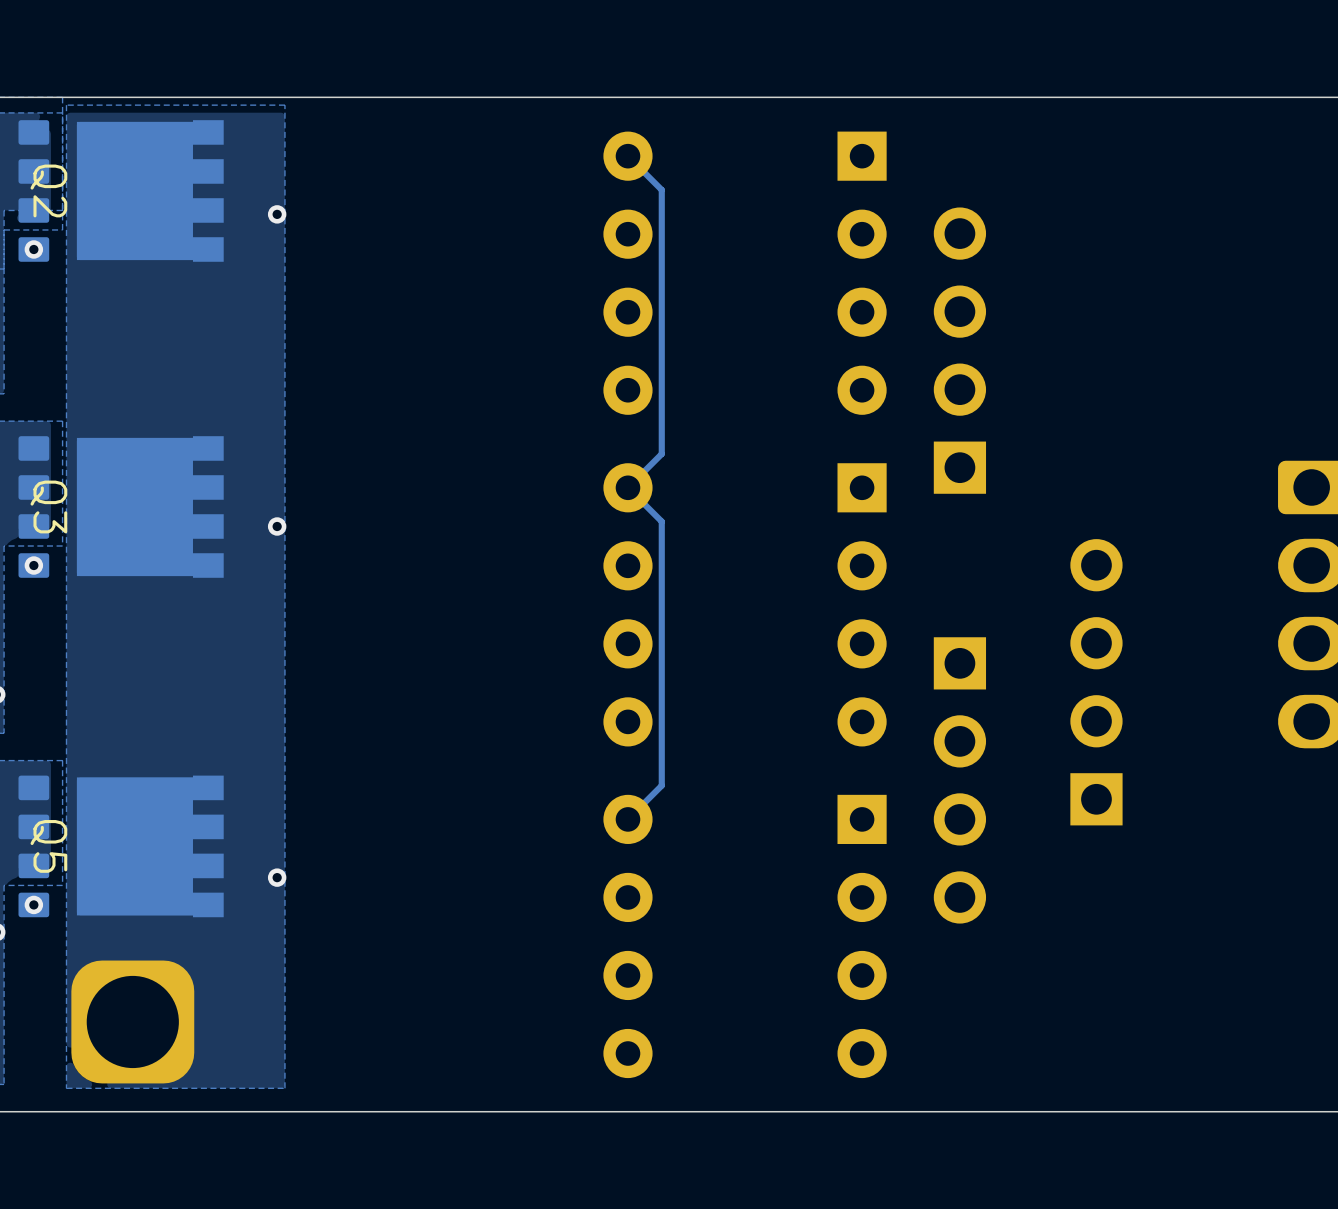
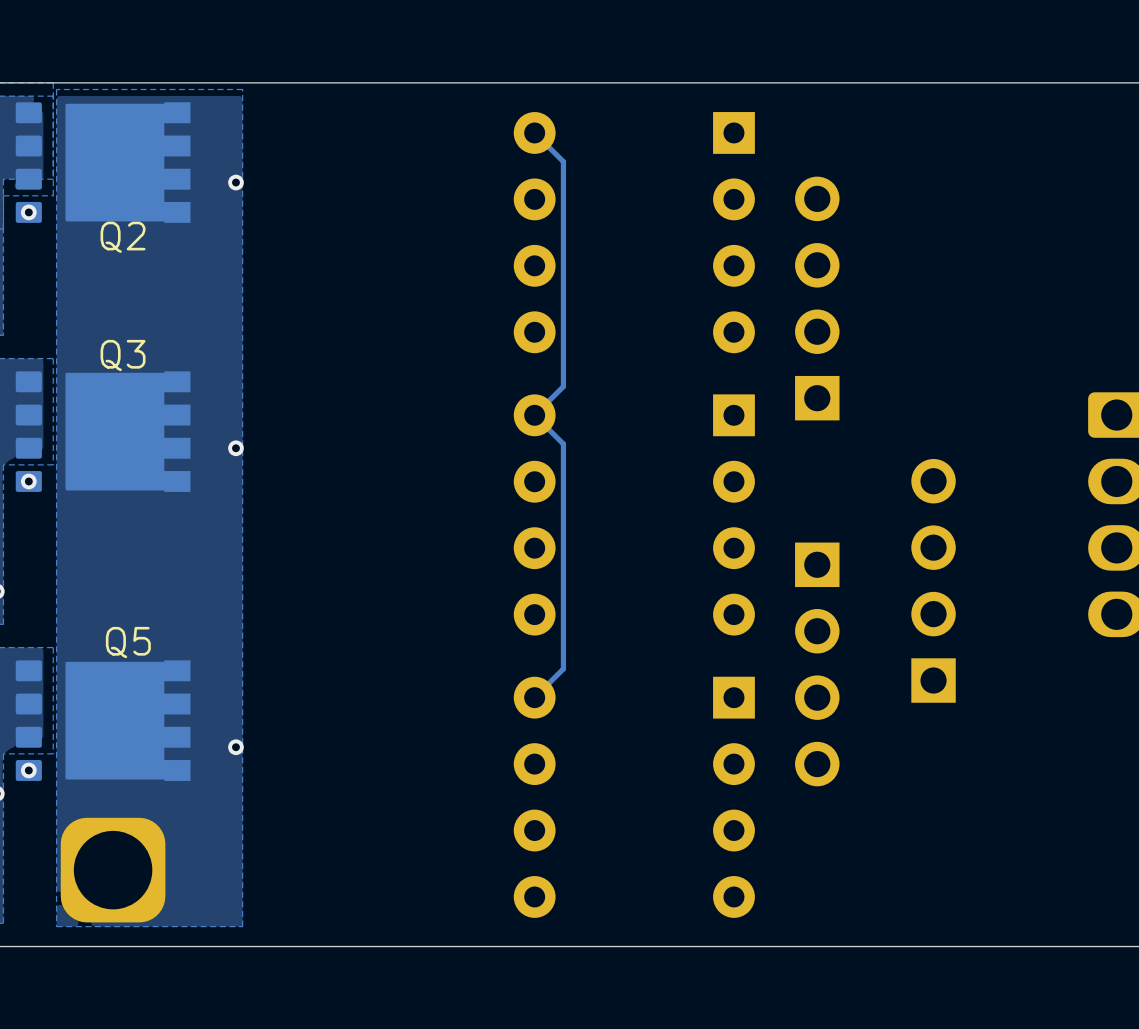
Q2 name rotation: 0° (48, 190) -> 90° counterclockwise (123, 237)
Q2 name position: Q2 (48, 190) -> Q2 (123, 237)
Q3 name rotation: 0° (48, 506) -> 90° counterclockwise (123, 355)
Q3 name position: Q3 (48, 506) -> Q3 (123, 355)
Q5 name rotation: 0° (48, 846) -> 90° counterclockwise (128, 642)
Q5 name position: Q5 (48, 846) -> Q5 (128, 642)

